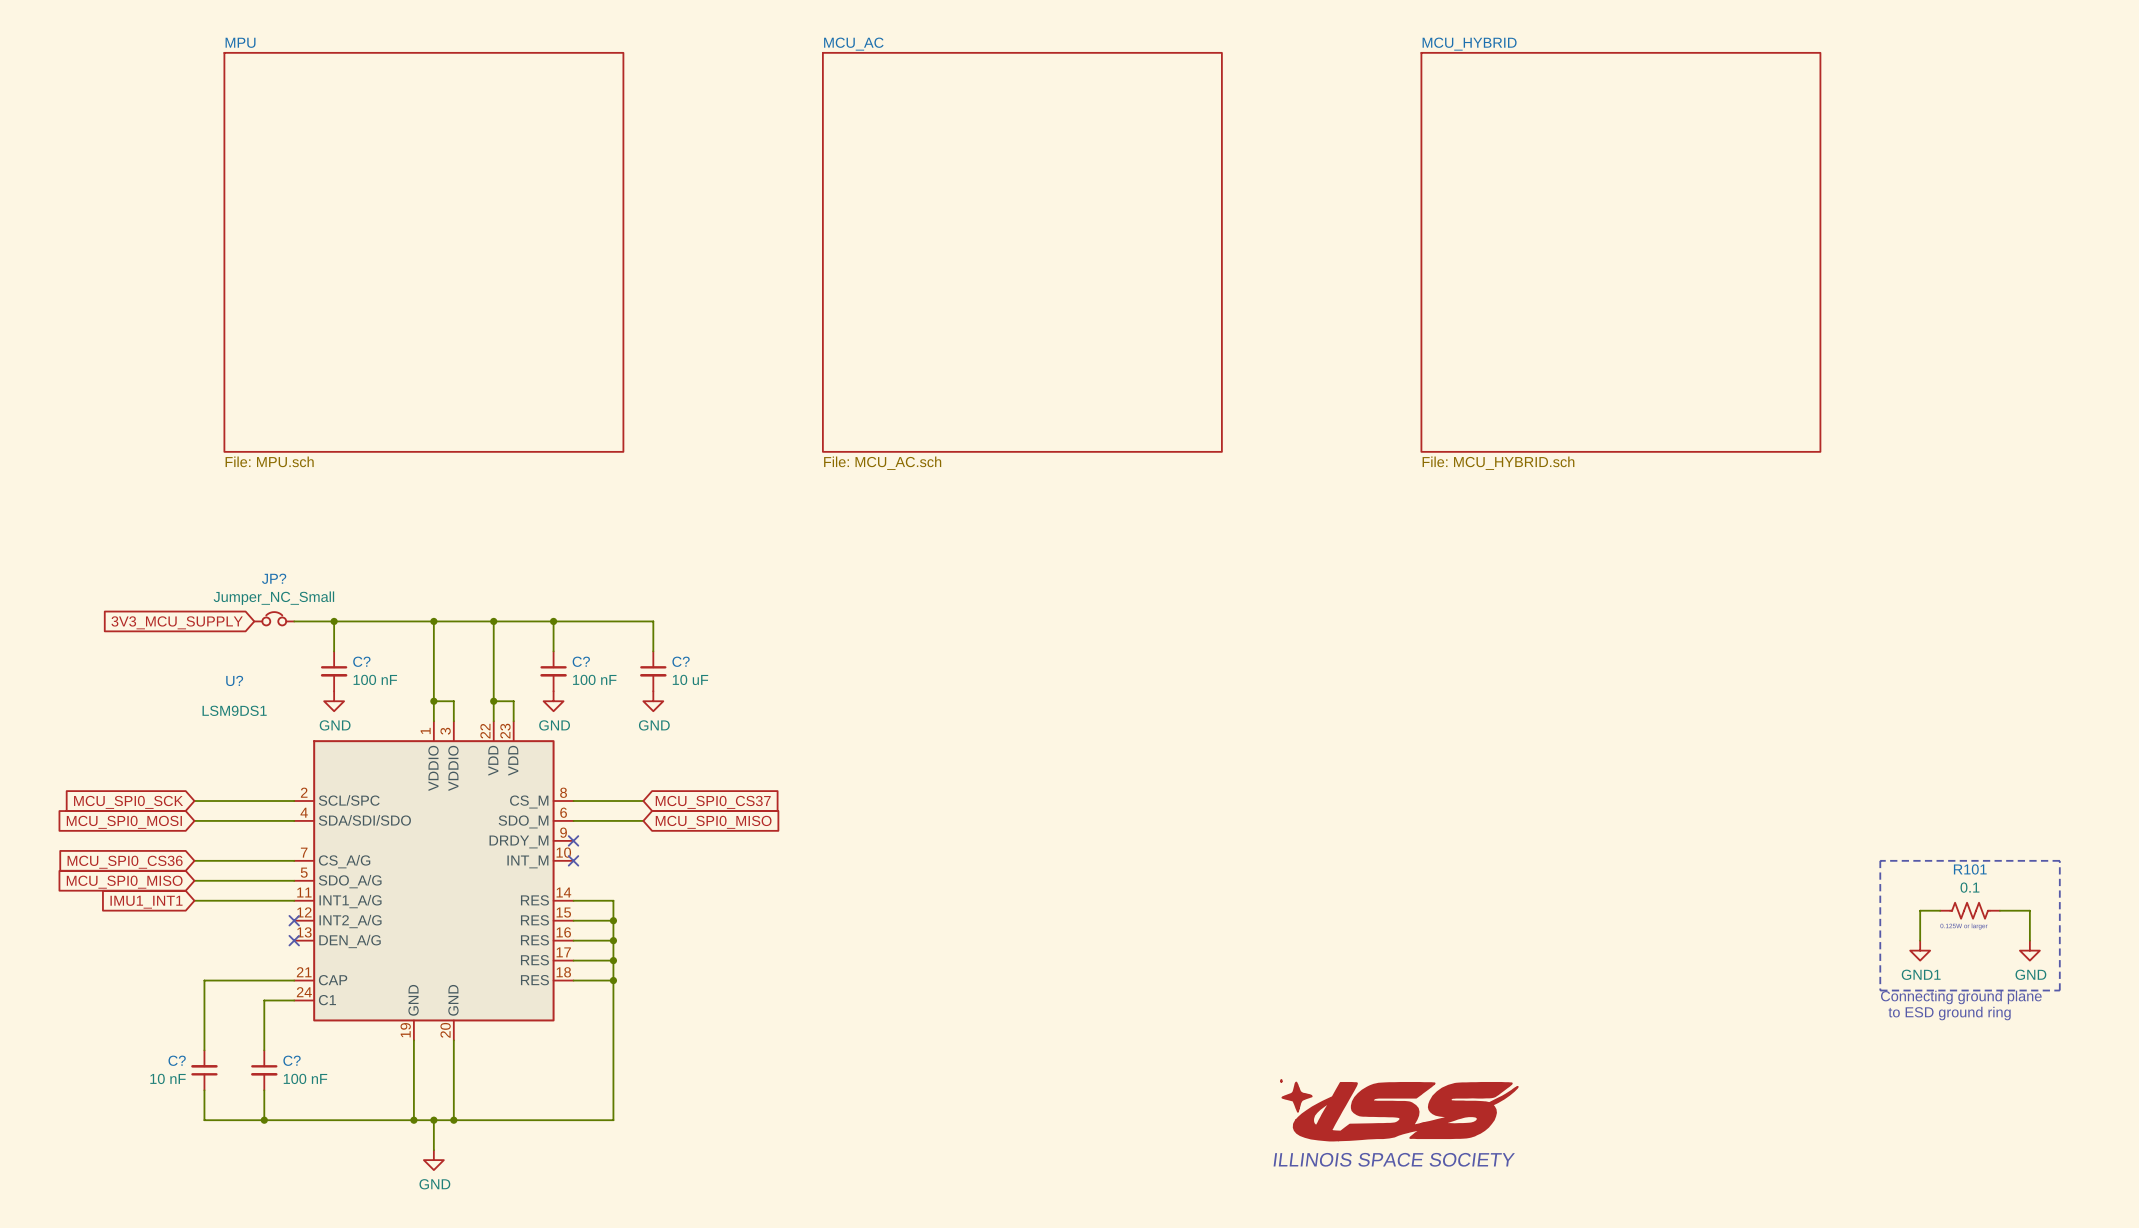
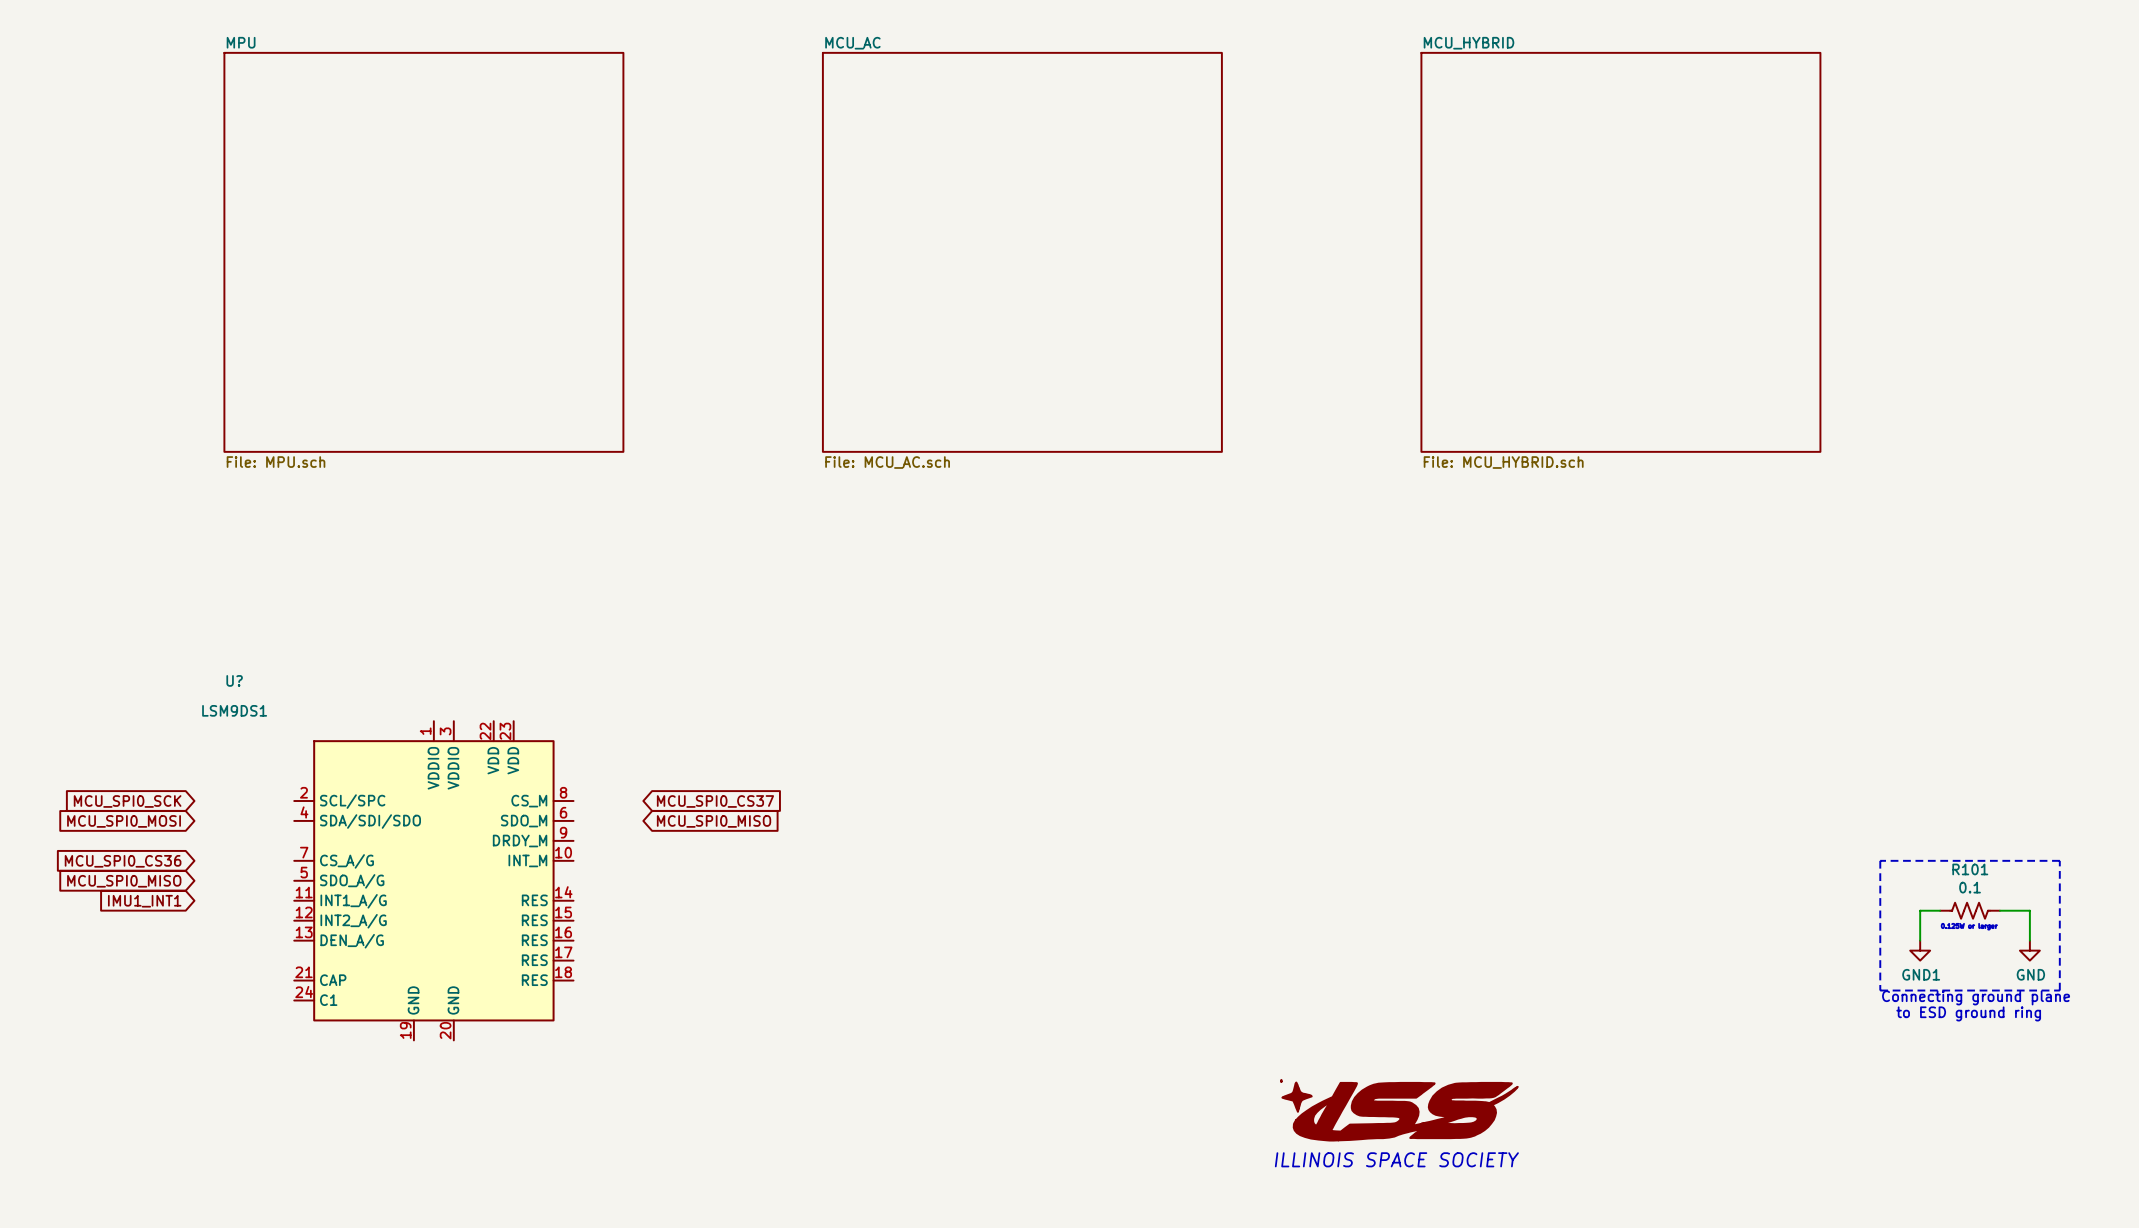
JP?: Jumper_NC_Small (274, 618) -> none
wire: (294, 621) (653, 621) (653, 651) -> none
wire: (334, 621) (334, 651) -> none
junction: (334, 621) -> none
wire: (433, 621) (433, 721) -> none
junction: (433, 621) -> none
wire: (493, 621) (493, 721) -> none
junction: (493, 621) -> none
wire: (553, 621) (553, 651) -> none
junction: (553, 621) -> none
global label: 3V3_MCU_SUPPLY (177, 622) -> none
C?: 100 nF (334, 671) -> none
C?: 100 nF (553, 671) -> none
C?: 10 uF (653, 671) -> none
power symbol: GND (334, 701) -> none
wire: (433, 701) (453, 701) (453, 721) -> none
junction: (433, 701) -> none
wire: (493, 701) (513, 701) (513, 721) -> none
junction: (493, 701) -> none
power symbol: GND (553, 701) -> none
power symbol: GND (653, 701) -> none
wire: (194, 801) (294, 801) -> none
wire: (573, 801) (643, 801) -> none
wire: (194, 820) (294, 820) -> none
wire: (573, 820) (643, 820) -> none
no-connect mark: (573, 840) -> none
wire: (194, 860) (294, 860) -> none
no-connect mark: (573, 860) -> none
wire: (194, 880) (294, 880) -> none
wire: (194, 900) (294, 900) -> none
wire: (573, 900) (613, 900) (613, 1120) (204, 1120) (204, 1090) -> none
no-connect mark: (294, 920) -> none
wire: (573, 920) (613, 920) -> none
junction: (613, 920) -> none
no-connect mark: (294, 940) -> none
wire: (573, 940) (613, 940) -> none
junction: (613, 940) -> none
wire: (573, 960) (613, 960) -> none
junction: (613, 960) -> none
wire: (294, 980) (204, 980) (204, 1050) -> none
wire: (573, 980) (613, 980) -> none
junction: (613, 980) -> none
wire: (294, 1000) (264, 1000) (264, 1050) -> none
wire: (413, 1040) (413, 1120) -> none
wire: (453, 1040) (453, 1120) -> none
C?: 10 nF (204, 1070) -> none
C?: 100 nF (264, 1070) -> none
wire: (264, 1090) (264, 1120) -> none
junction: (264, 1120) -> none
junction: (413, 1120) -> none
wire: (433, 1120) (433, 1150) -> none
junction: (433, 1120) -> none
junction: (453, 1120) -> none
power symbol: GND (433, 1160) -> none

